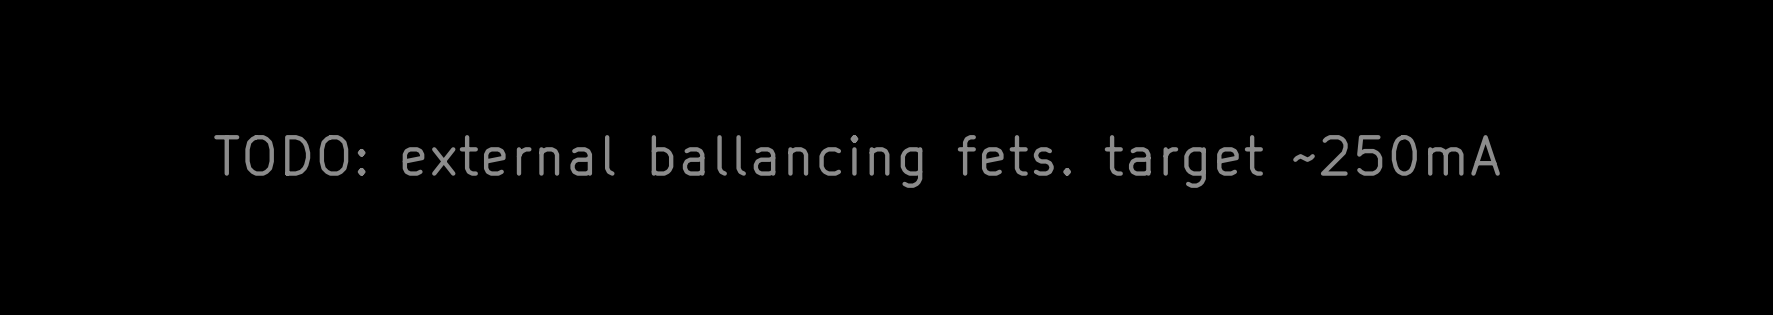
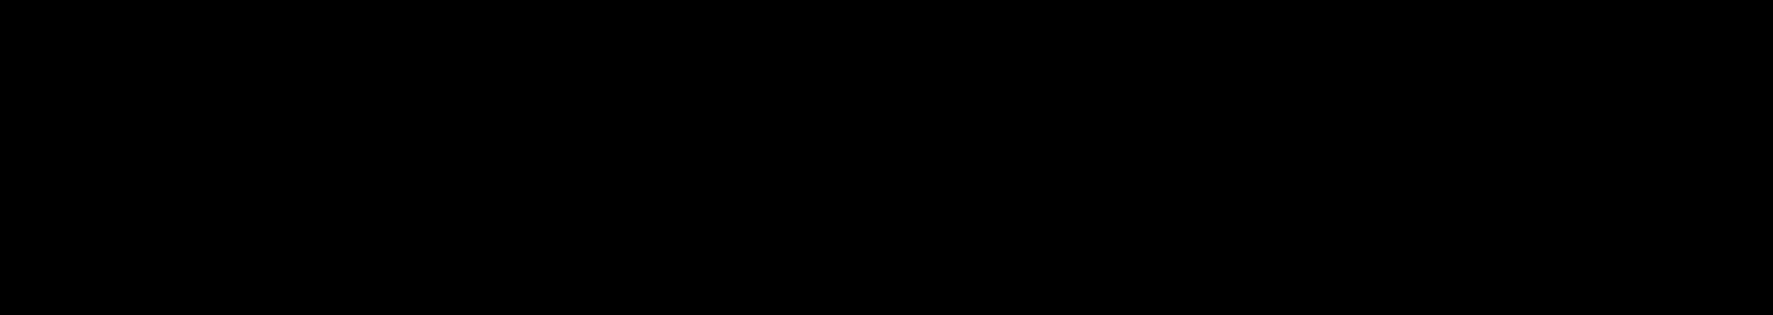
text: TODO: external ballancing fets. target ~250mA (857, 161) -> none

